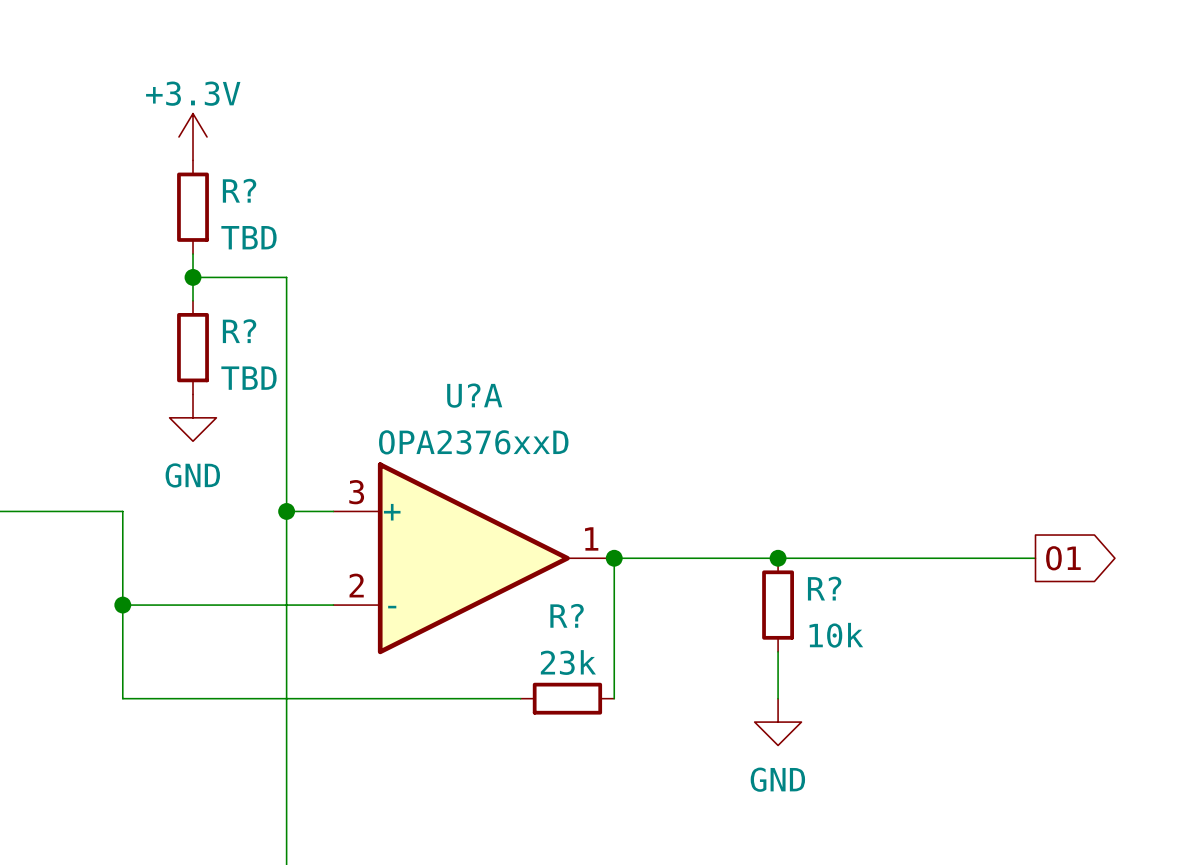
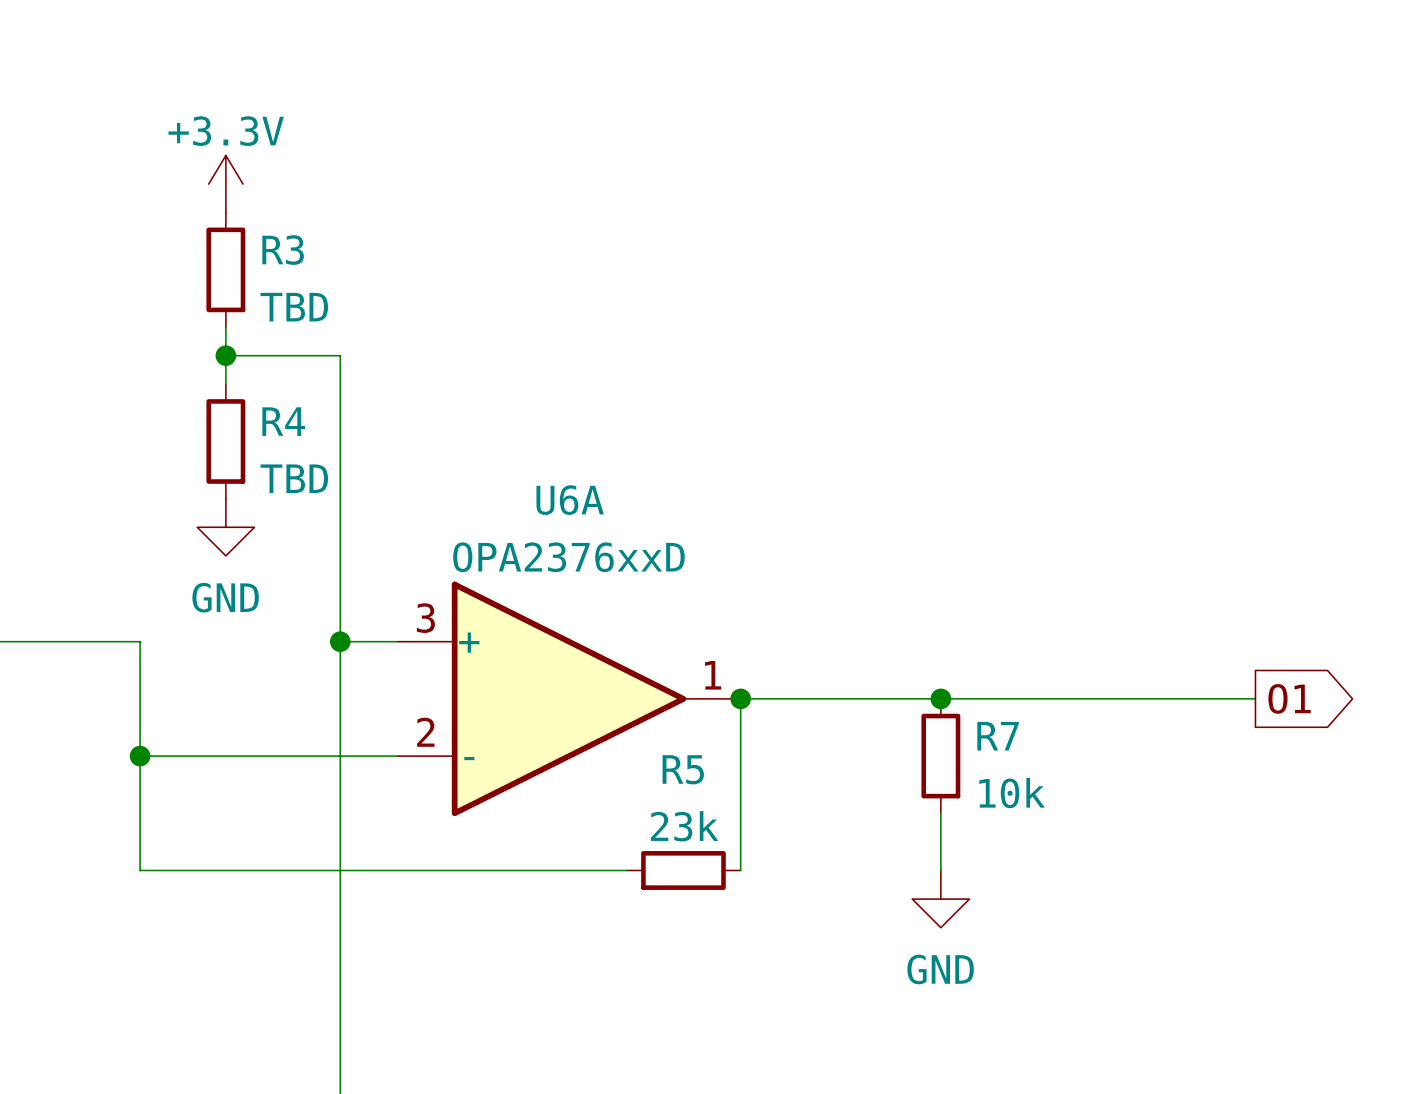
R? name: R? (239, 190) -> R3 (283, 250)
R? name: R? (239, 331) -> R4 (283, 421)
U?A name: U?A (474, 395) -> U6A (570, 500)
R? name: R? (824, 588) -> R7 (998, 736)
R? name: R? (567, 615) -> R5 (683, 769)

